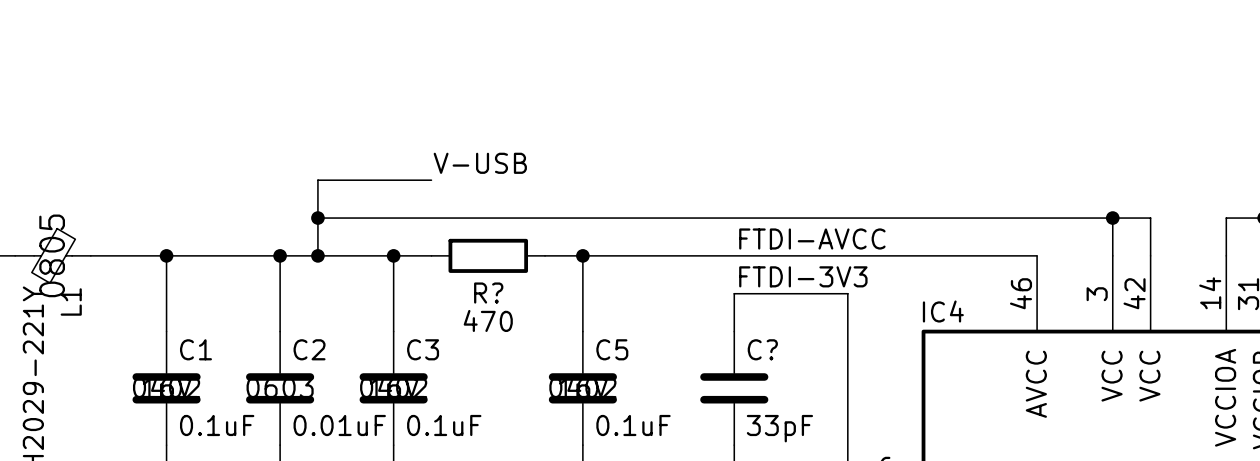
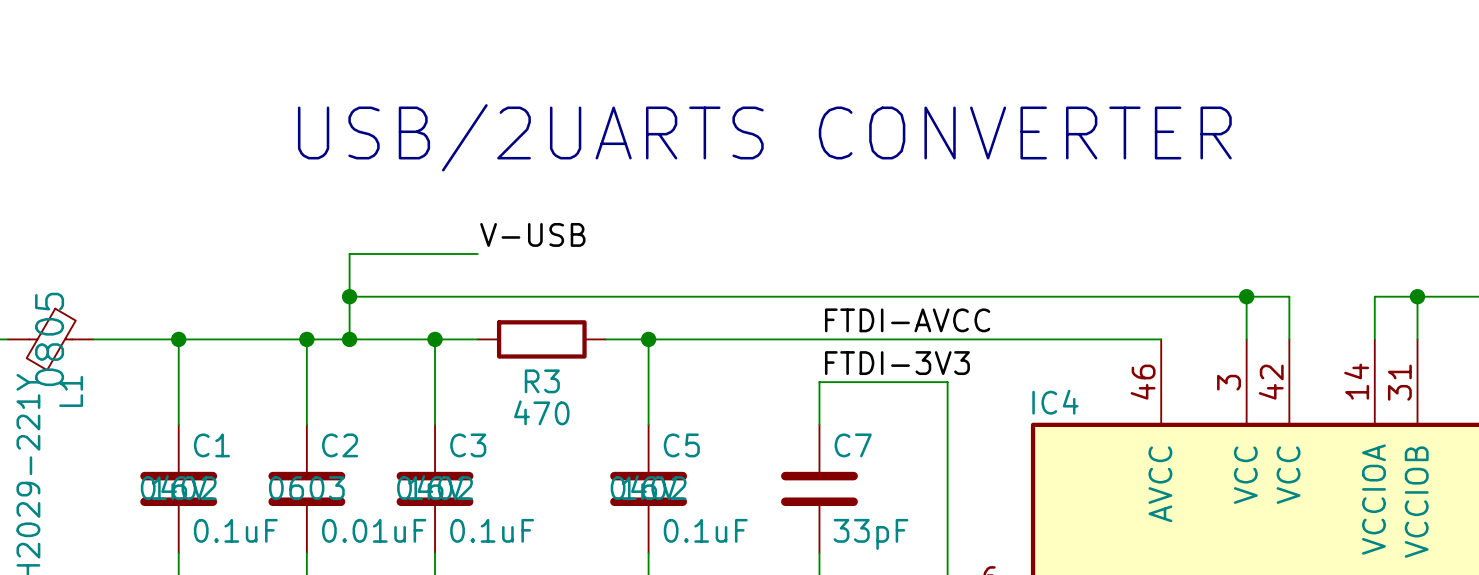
text: none -> USB/2UARTS CONVERTER (764, 137)
R? name: R? (488, 293) -> R3 (542, 381)
C? name: C? (762, 349) -> C7 (853, 445)

